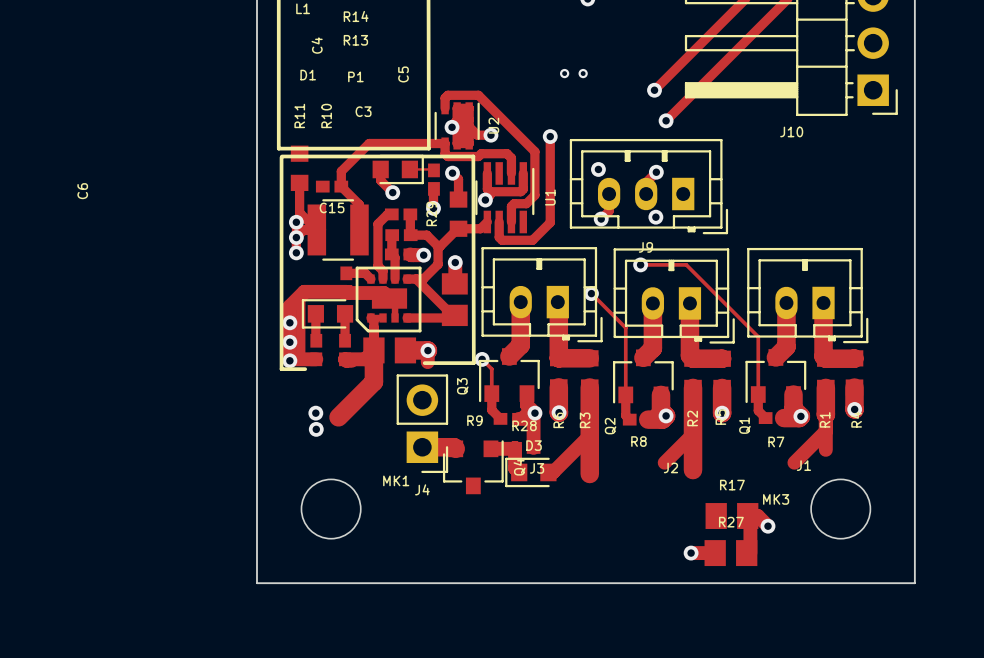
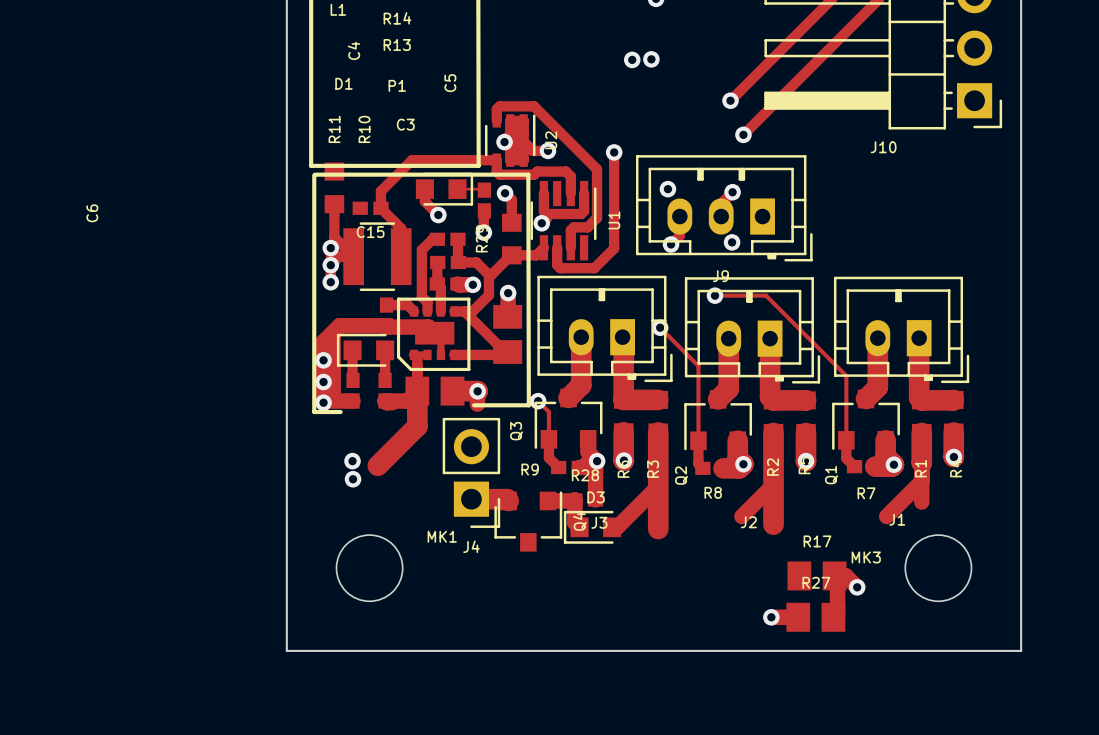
via: none -> (632, 59)
via: none -> (651, 59)
via: (564, 73) -> none
via: (583, 73) -> none

